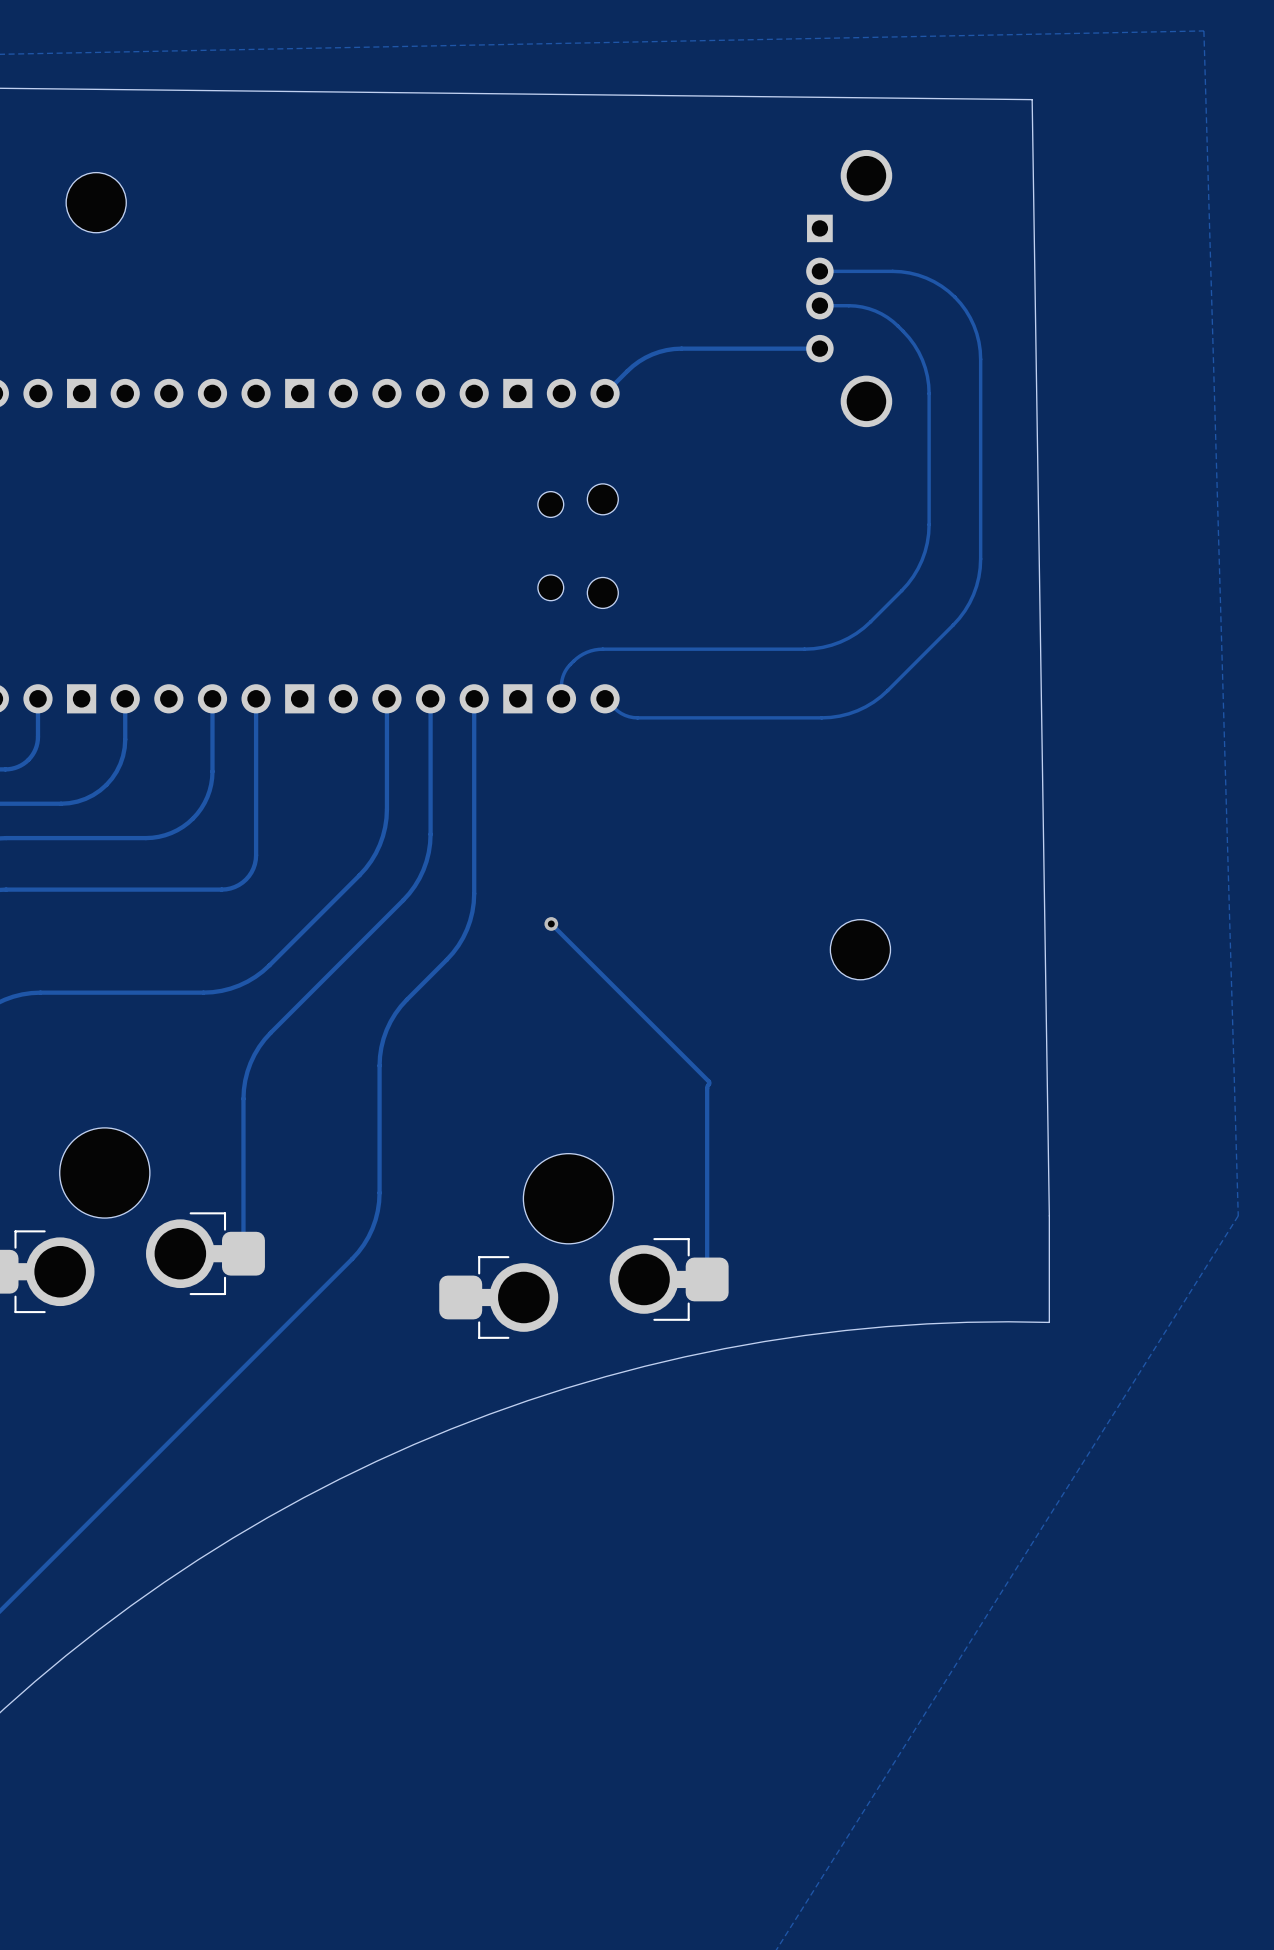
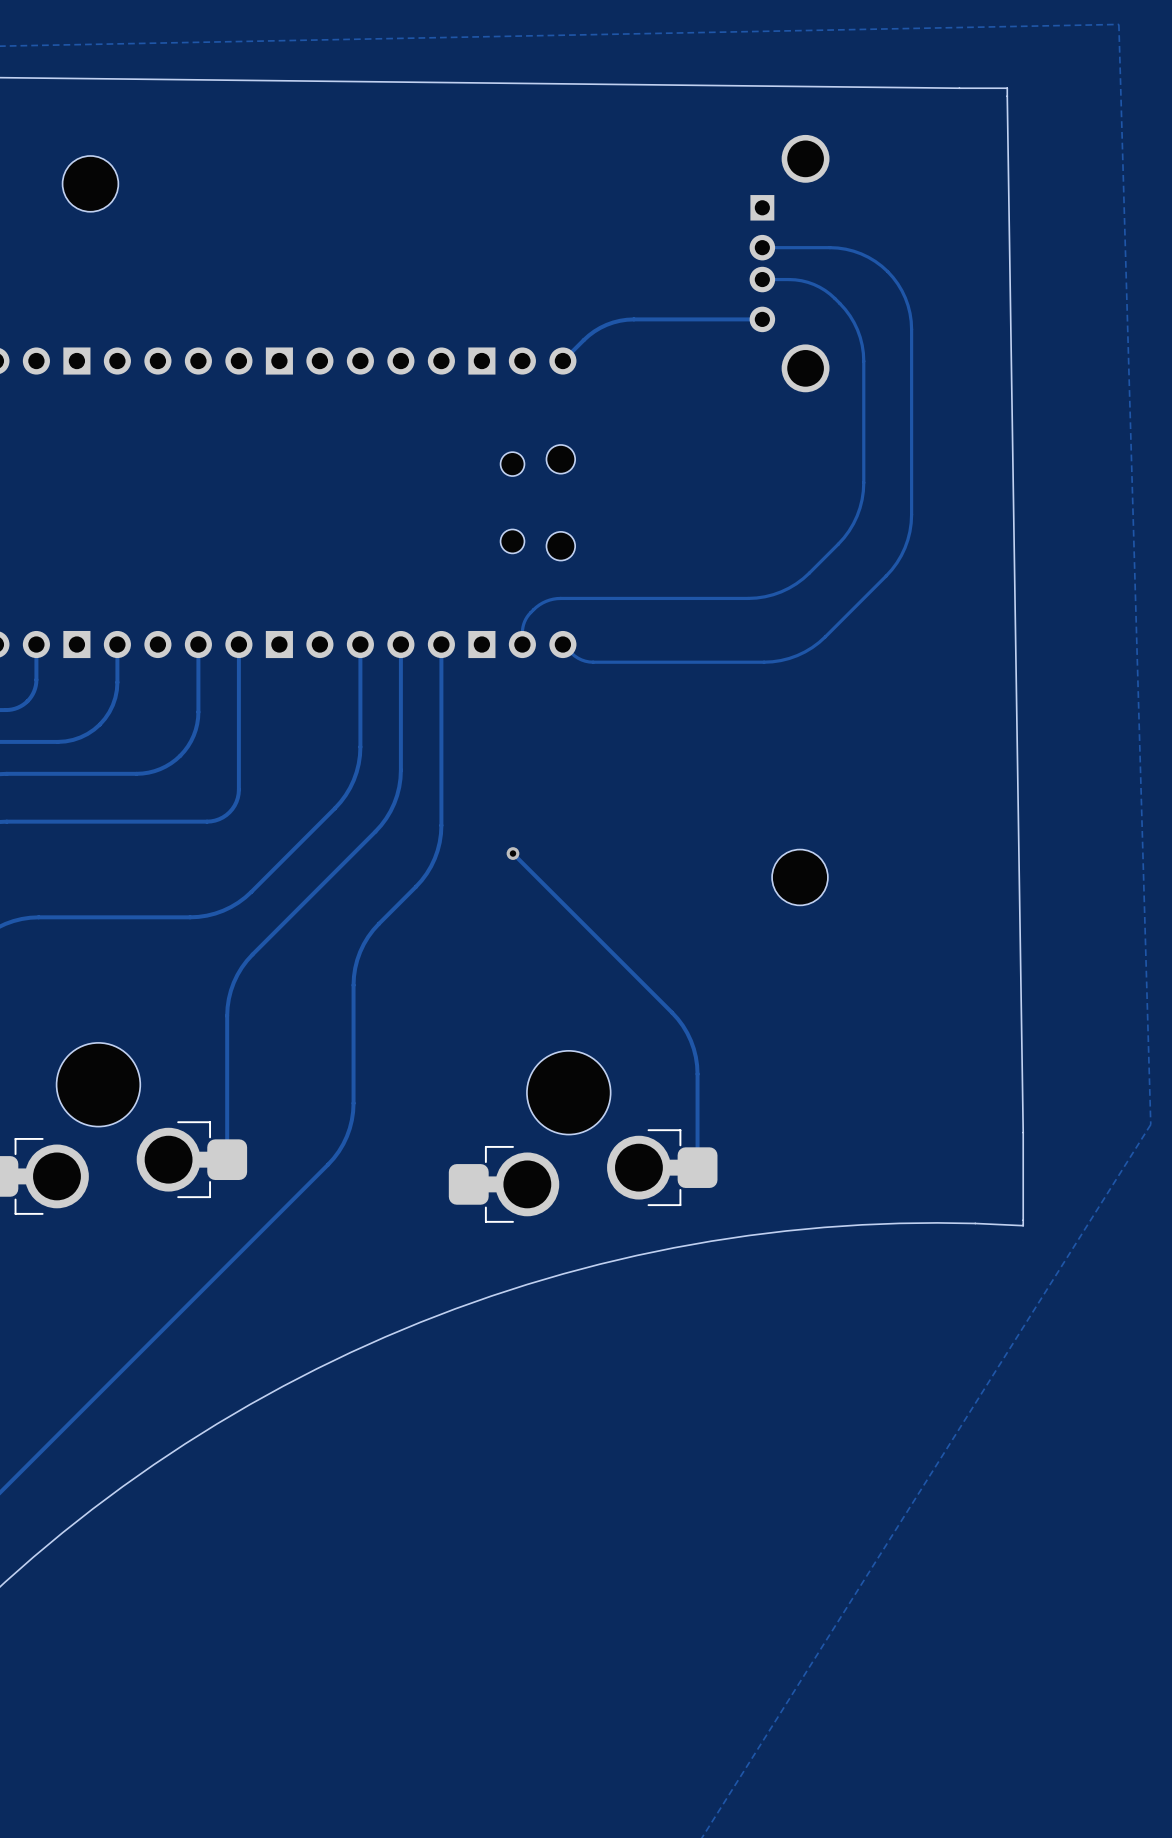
board edge: (1032, 99) (1049, 1322) -> (959, 88) (1007, 88) (1023, 1132) (1023, 1225) (975, 1223)
track: (708, 1081) (707, 1088) (707, 1279) -> (659, 999) (682, 1025) (690, 1040) (695, 1057) (697, 1167)
part position: (583, 1246) -> (583, 1136)

